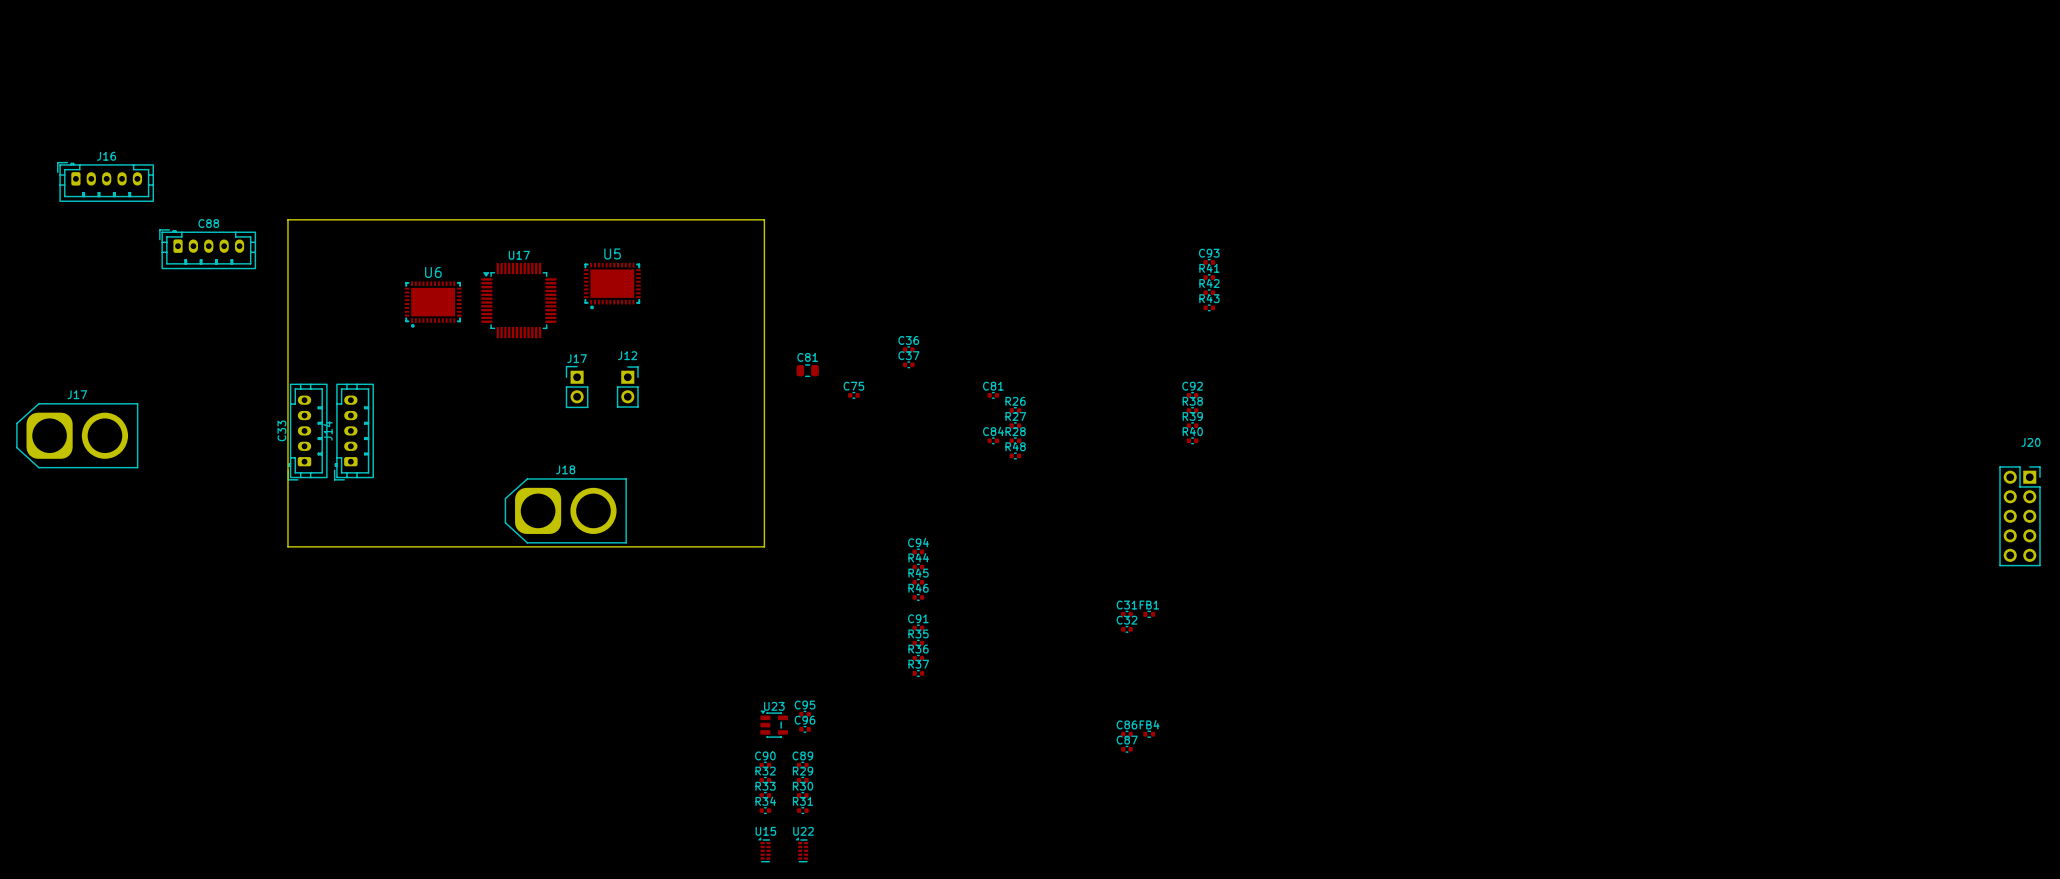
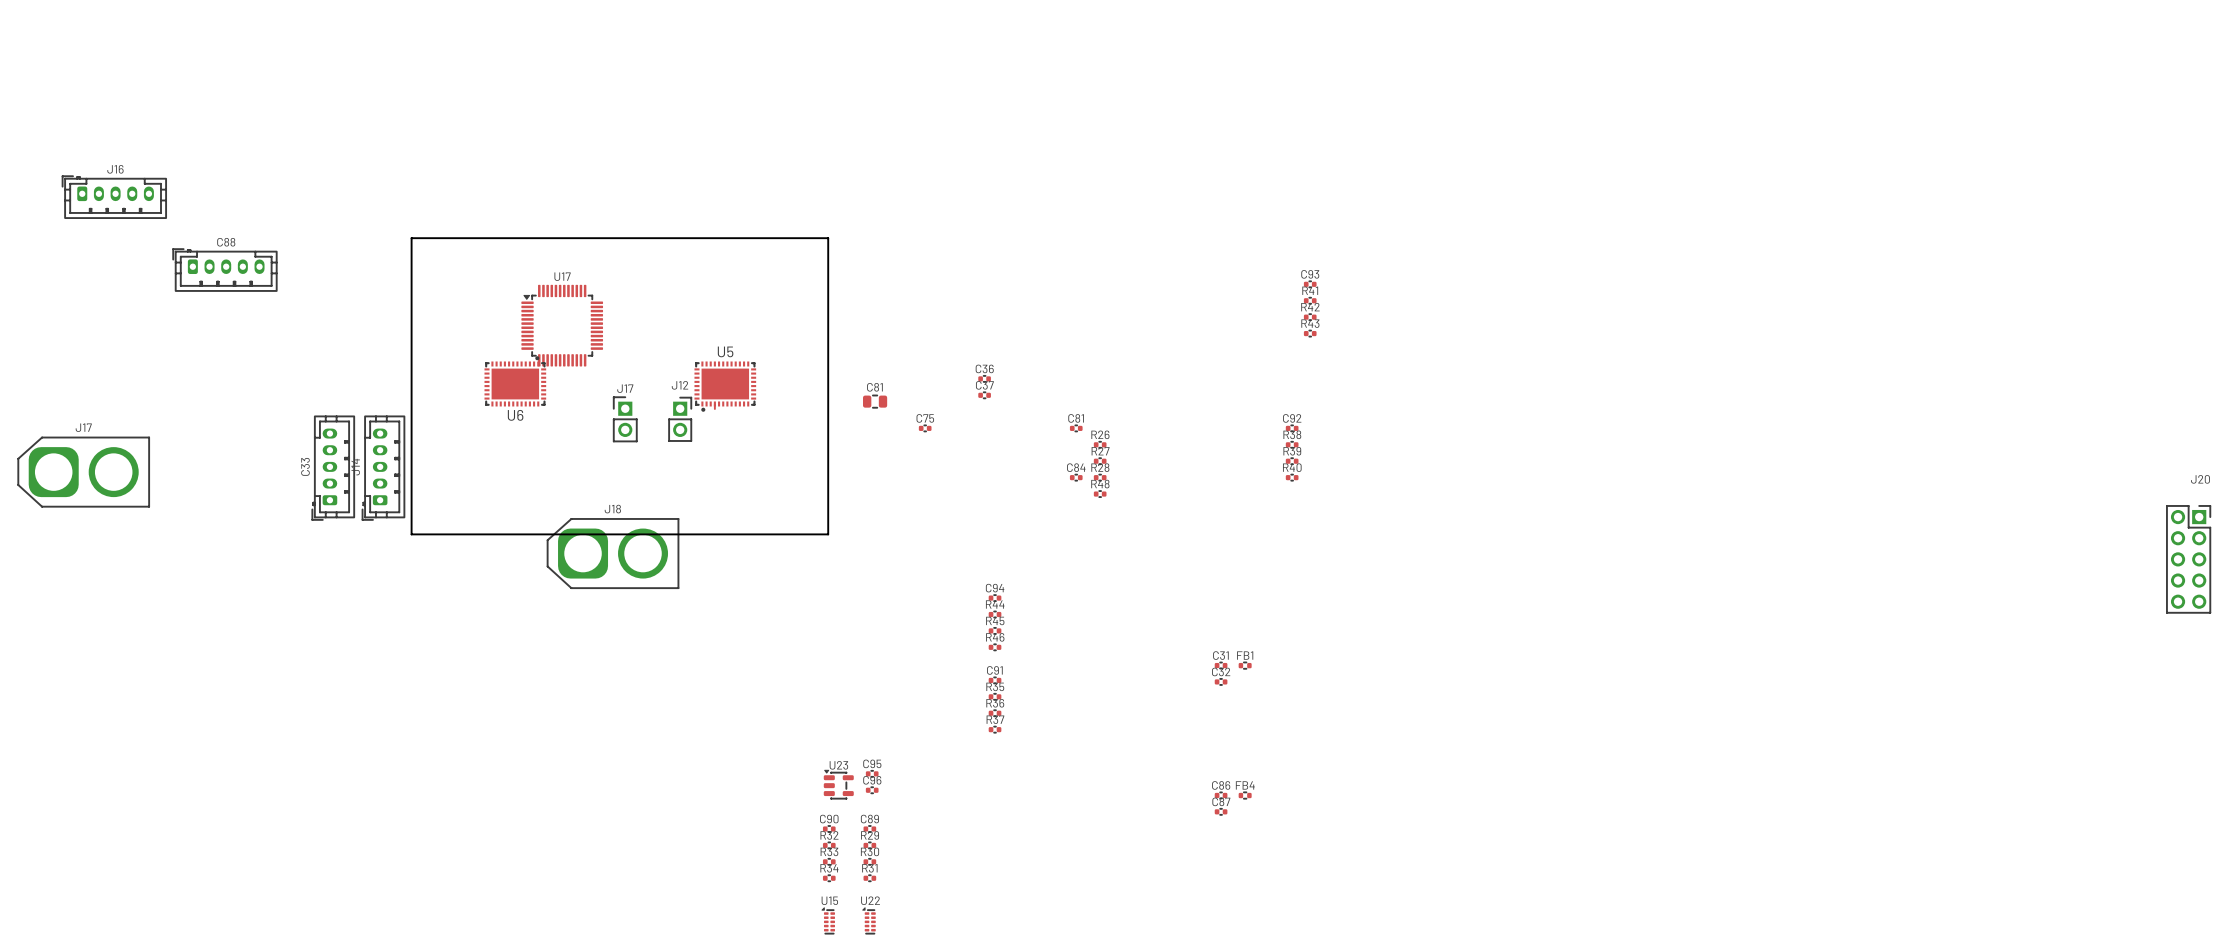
board edge: (379, 219) (287, 219) (287, 546) (764, 546) (764, 493) -> (411, 238) (411, 534) (828, 534)
U5 position: (612, 286) -> (725, 386)
U6 rotation: 0° (433, 304) -> 180° (515, 381)
U6 position: (433, 304) -> (515, 381)
track: none -> (714, 403) (714, 408)

